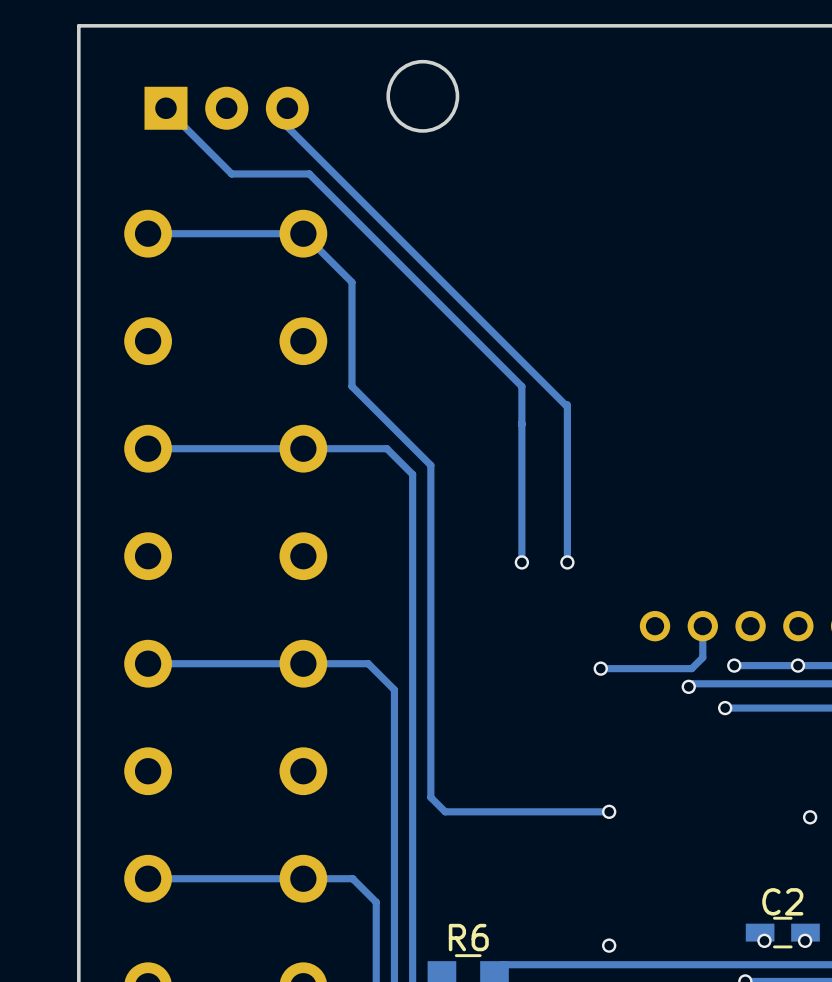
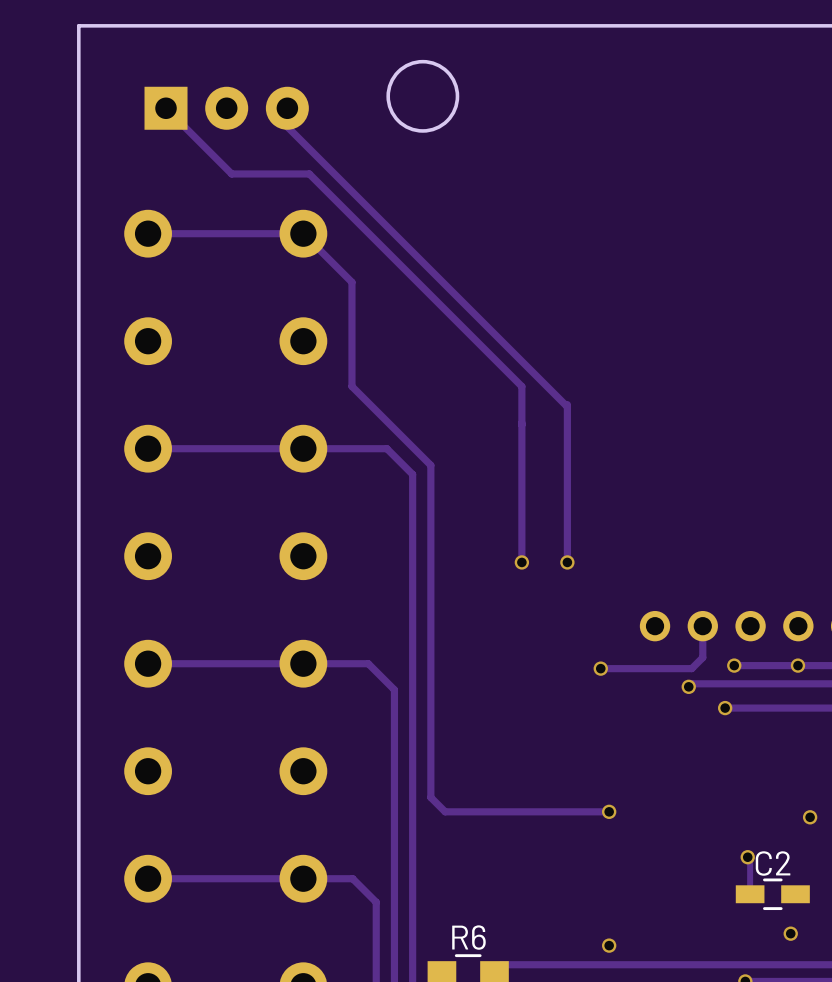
track: none -> (747, 857) (750, 859) (750, 894)
via: none -> (747, 857)
C2 position: (782, 932) -> (772, 894)
via: none -> (790, 933)
via: (764, 940) -> none
via: (805, 940) -> none

